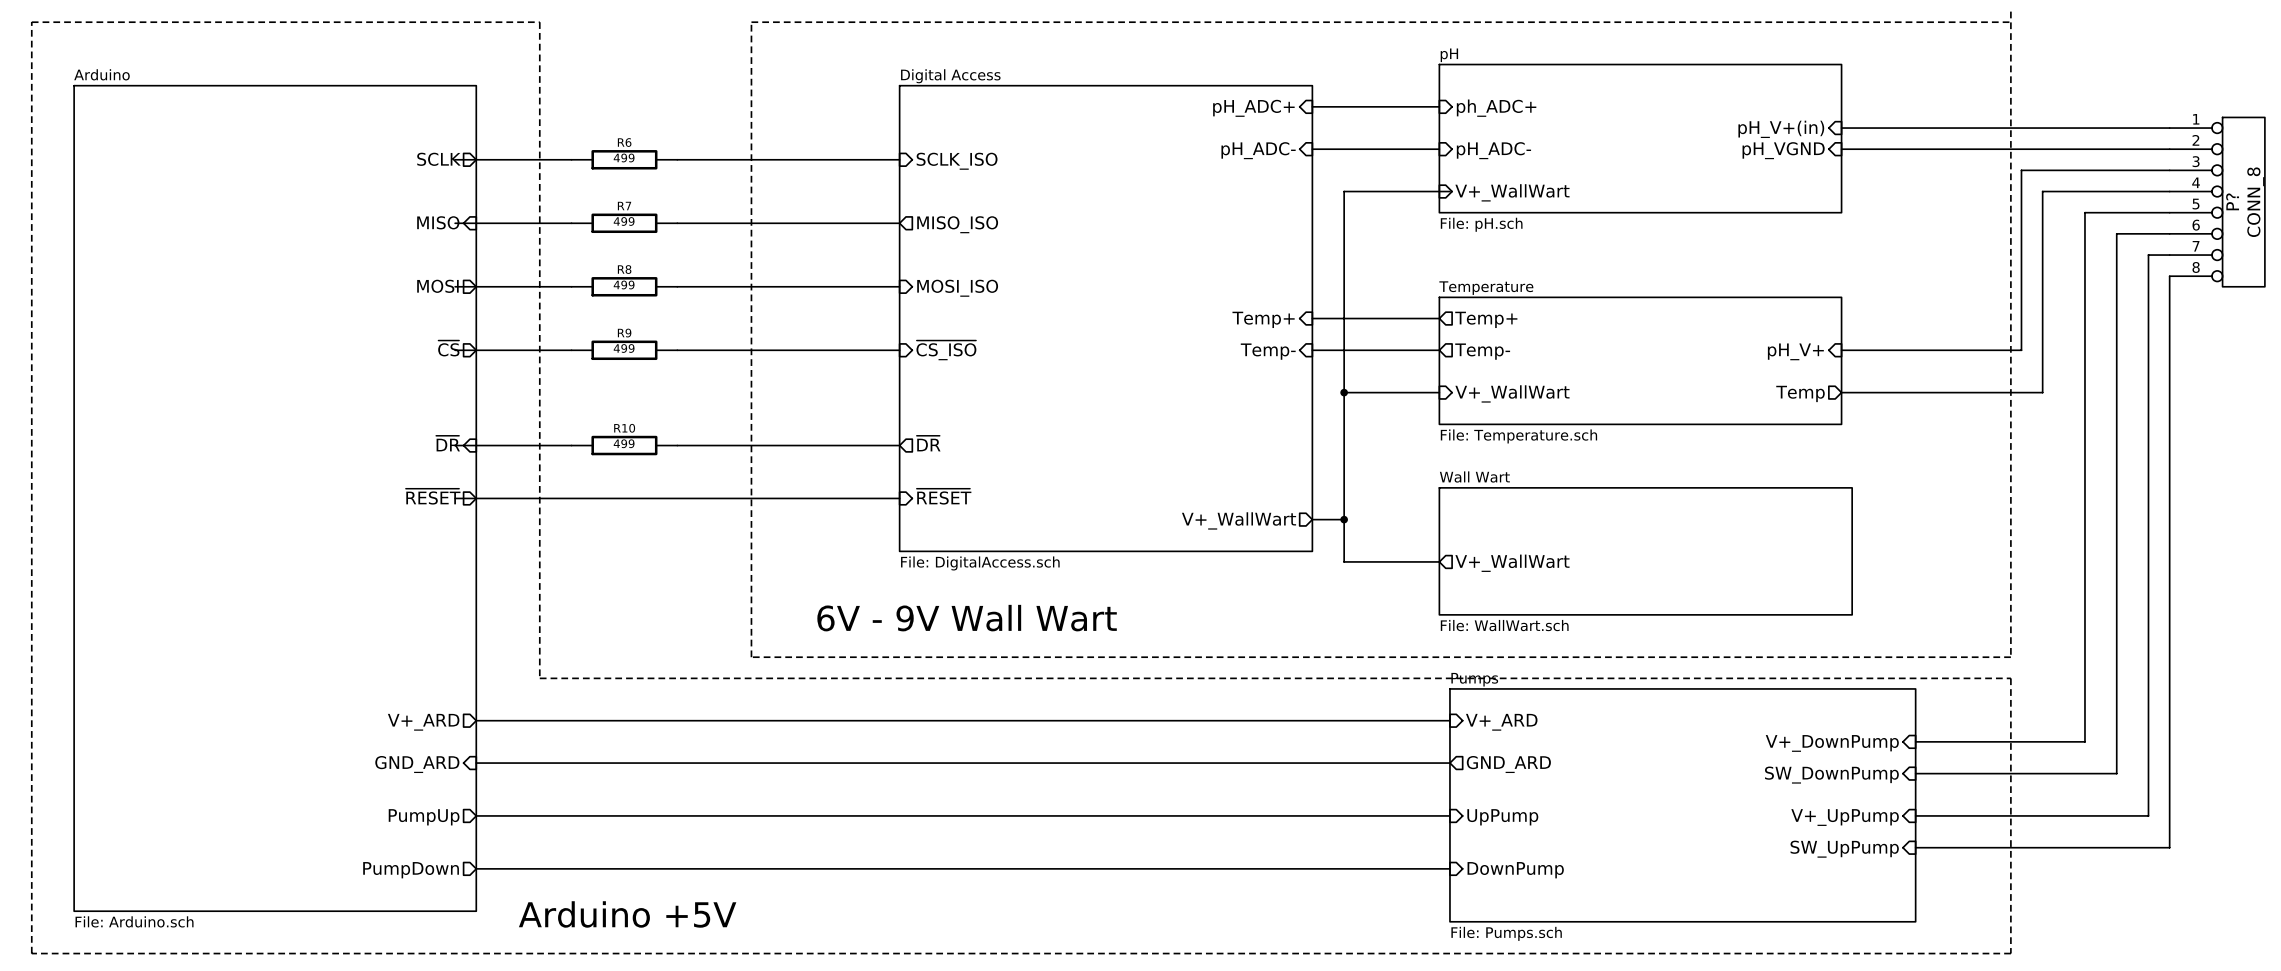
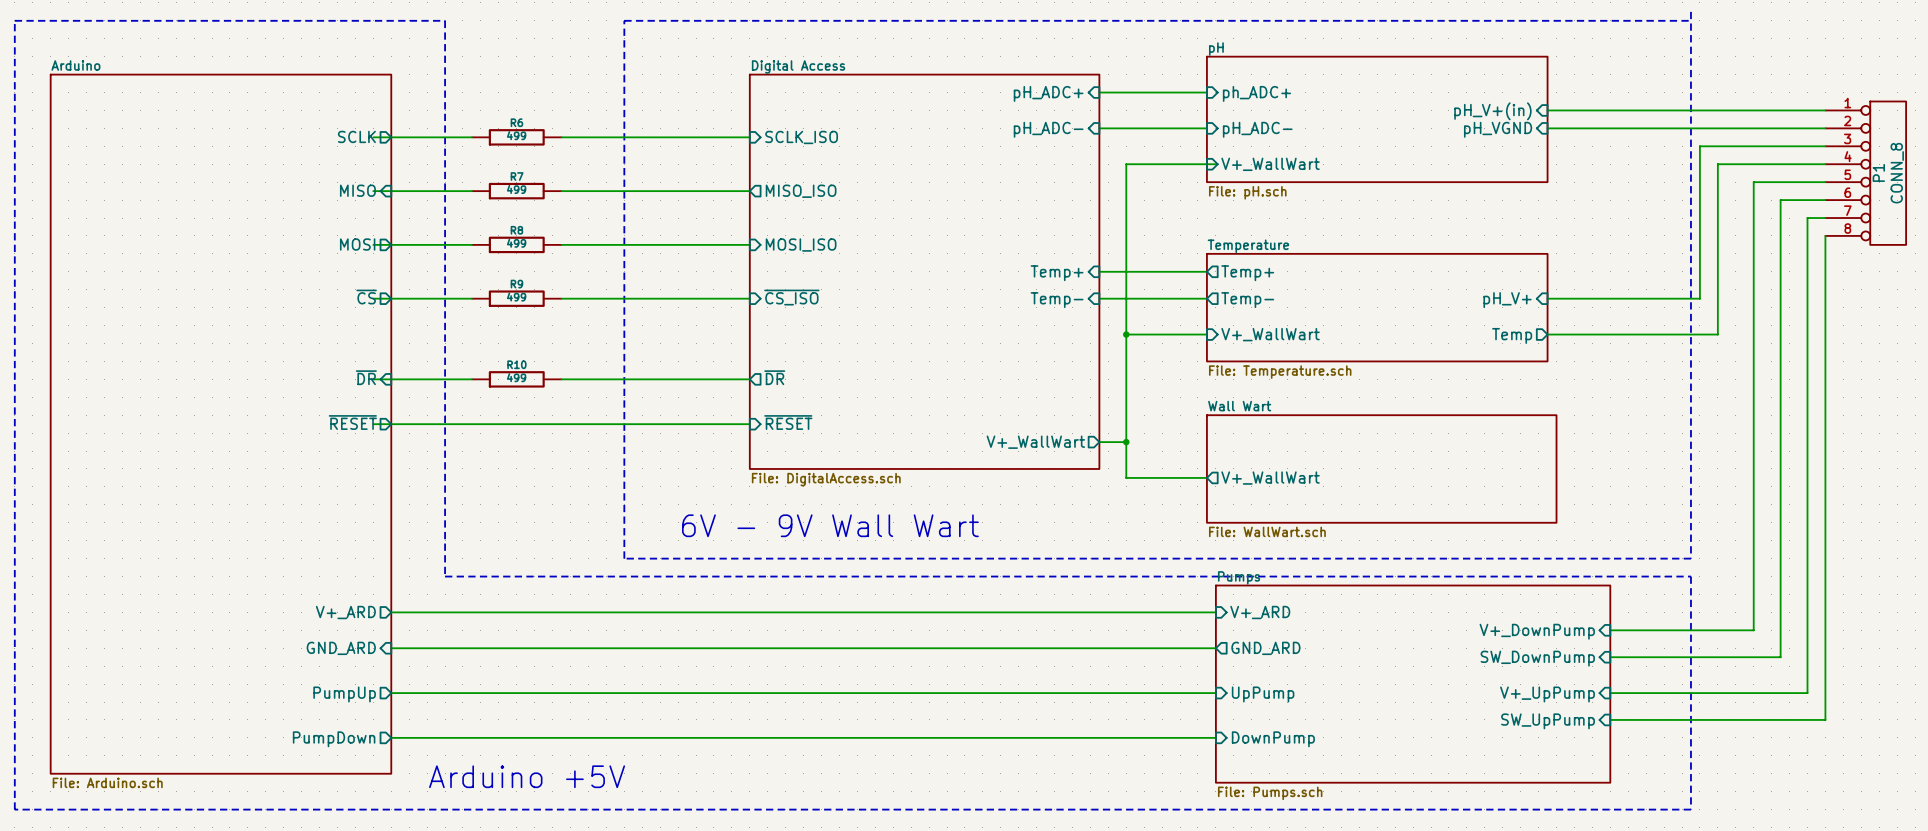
P? name: P? (2232, 201) -> P1 (1878, 172)

